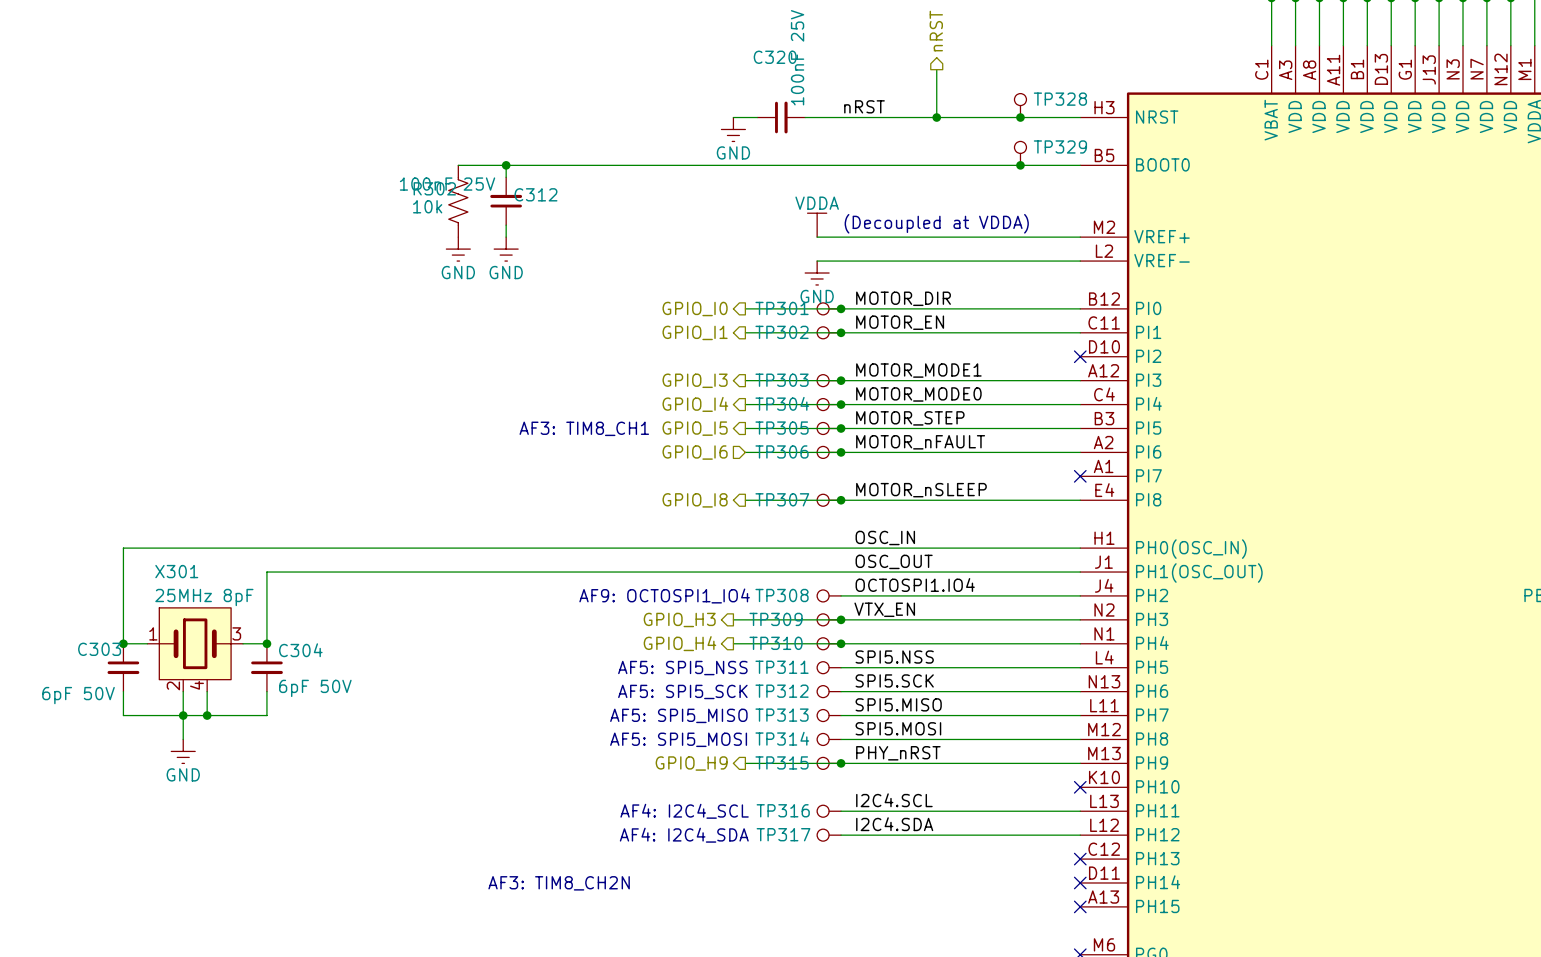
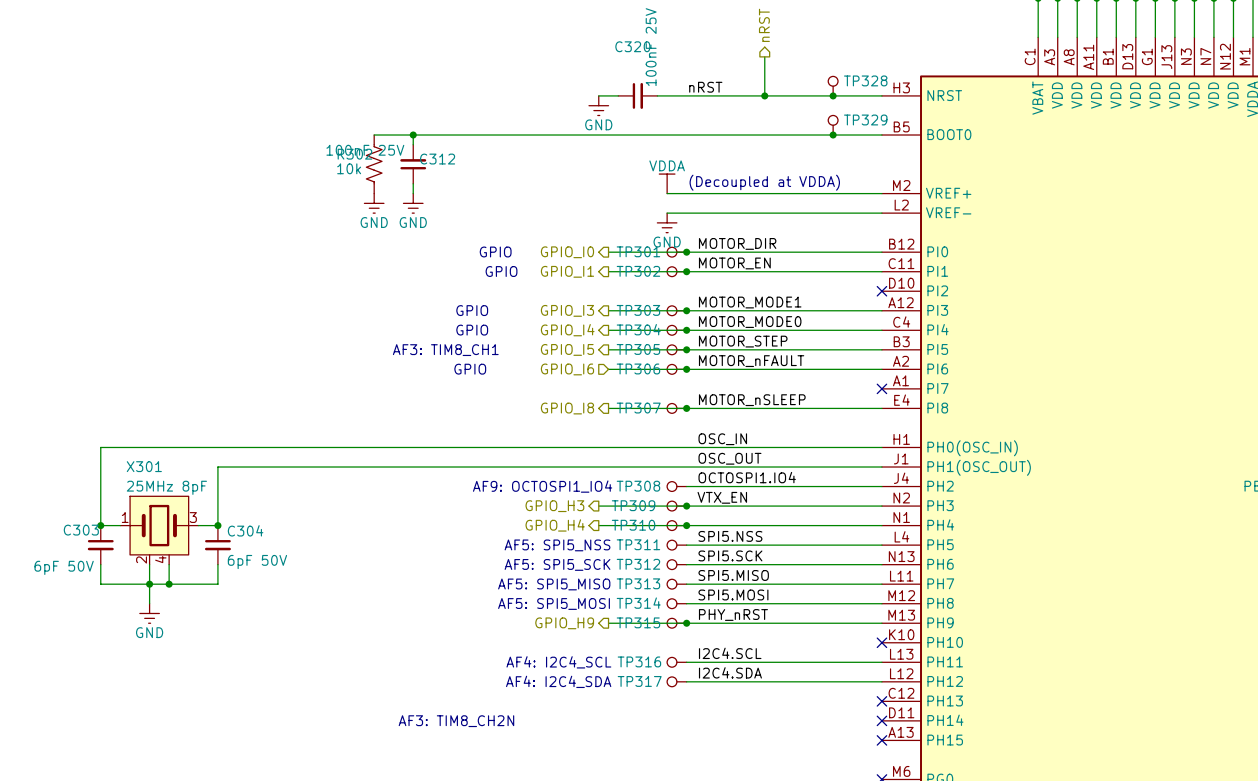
text: none -> GPIO (495, 251)
text: none -> GPIO (501, 271)
text: none -> GPIO (472, 310)
text: none -> GPIO (472, 330)
text position: AF3: TIM8_CH1 (584, 428) -> AF3: TIM8_CH1 (445, 350)
text: none -> GPIO (470, 369)

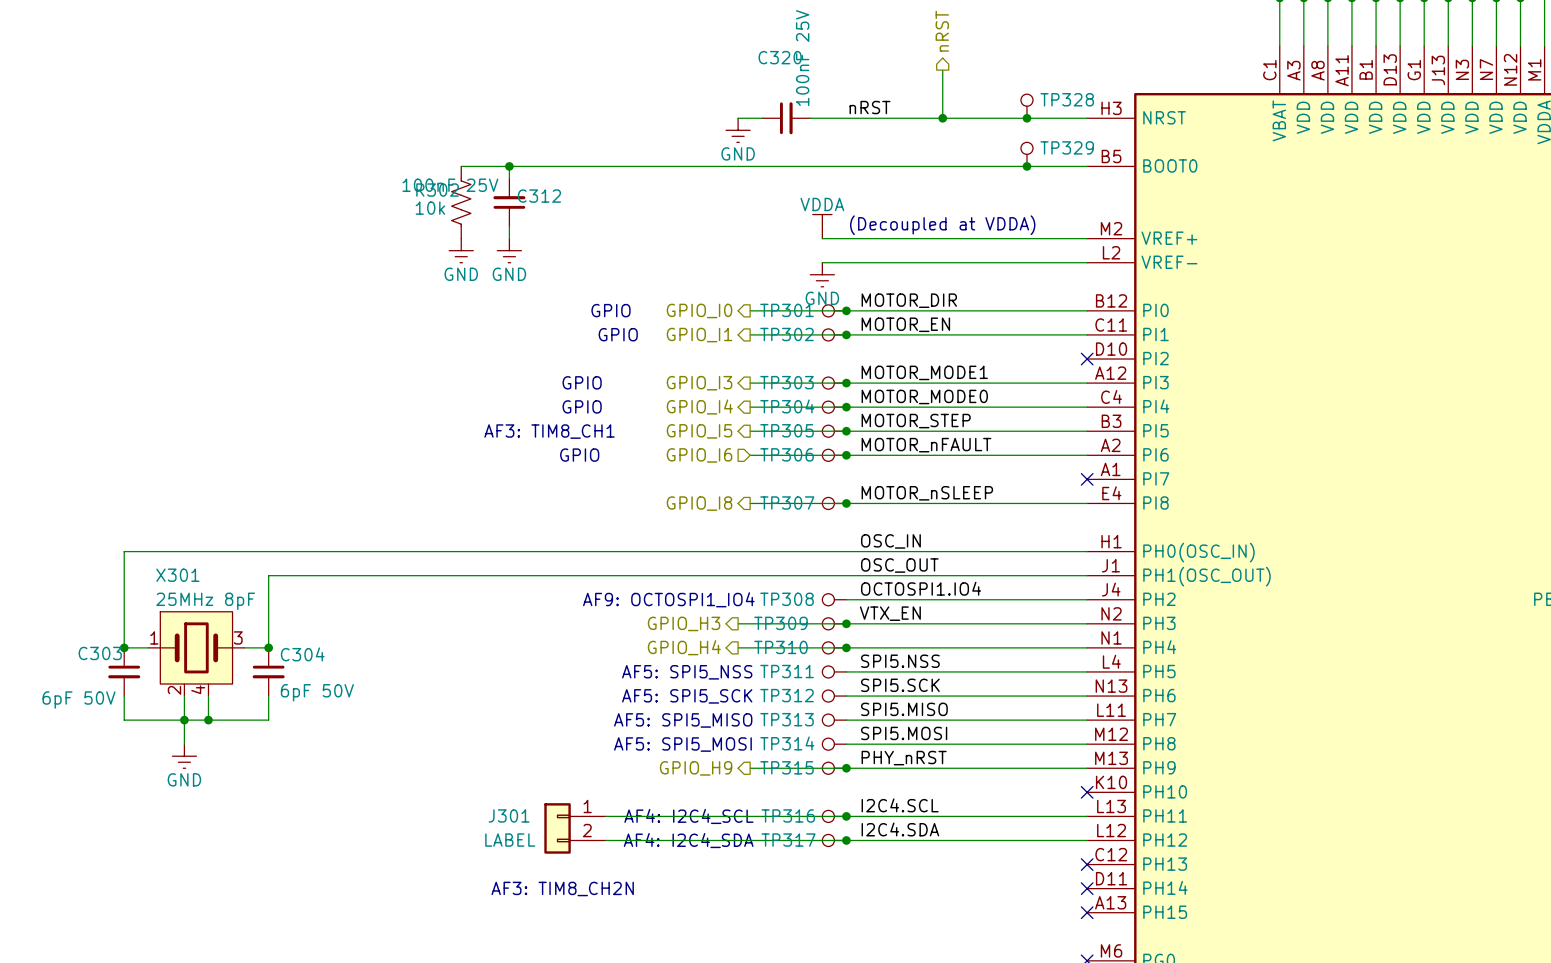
wire: none -> (605, 816) (846, 816)
junction: none -> (846, 816)
J301: none -> LABEL (575, 828)
wire: none -> (605, 840) (846, 840)
junction: none -> (846, 840)

